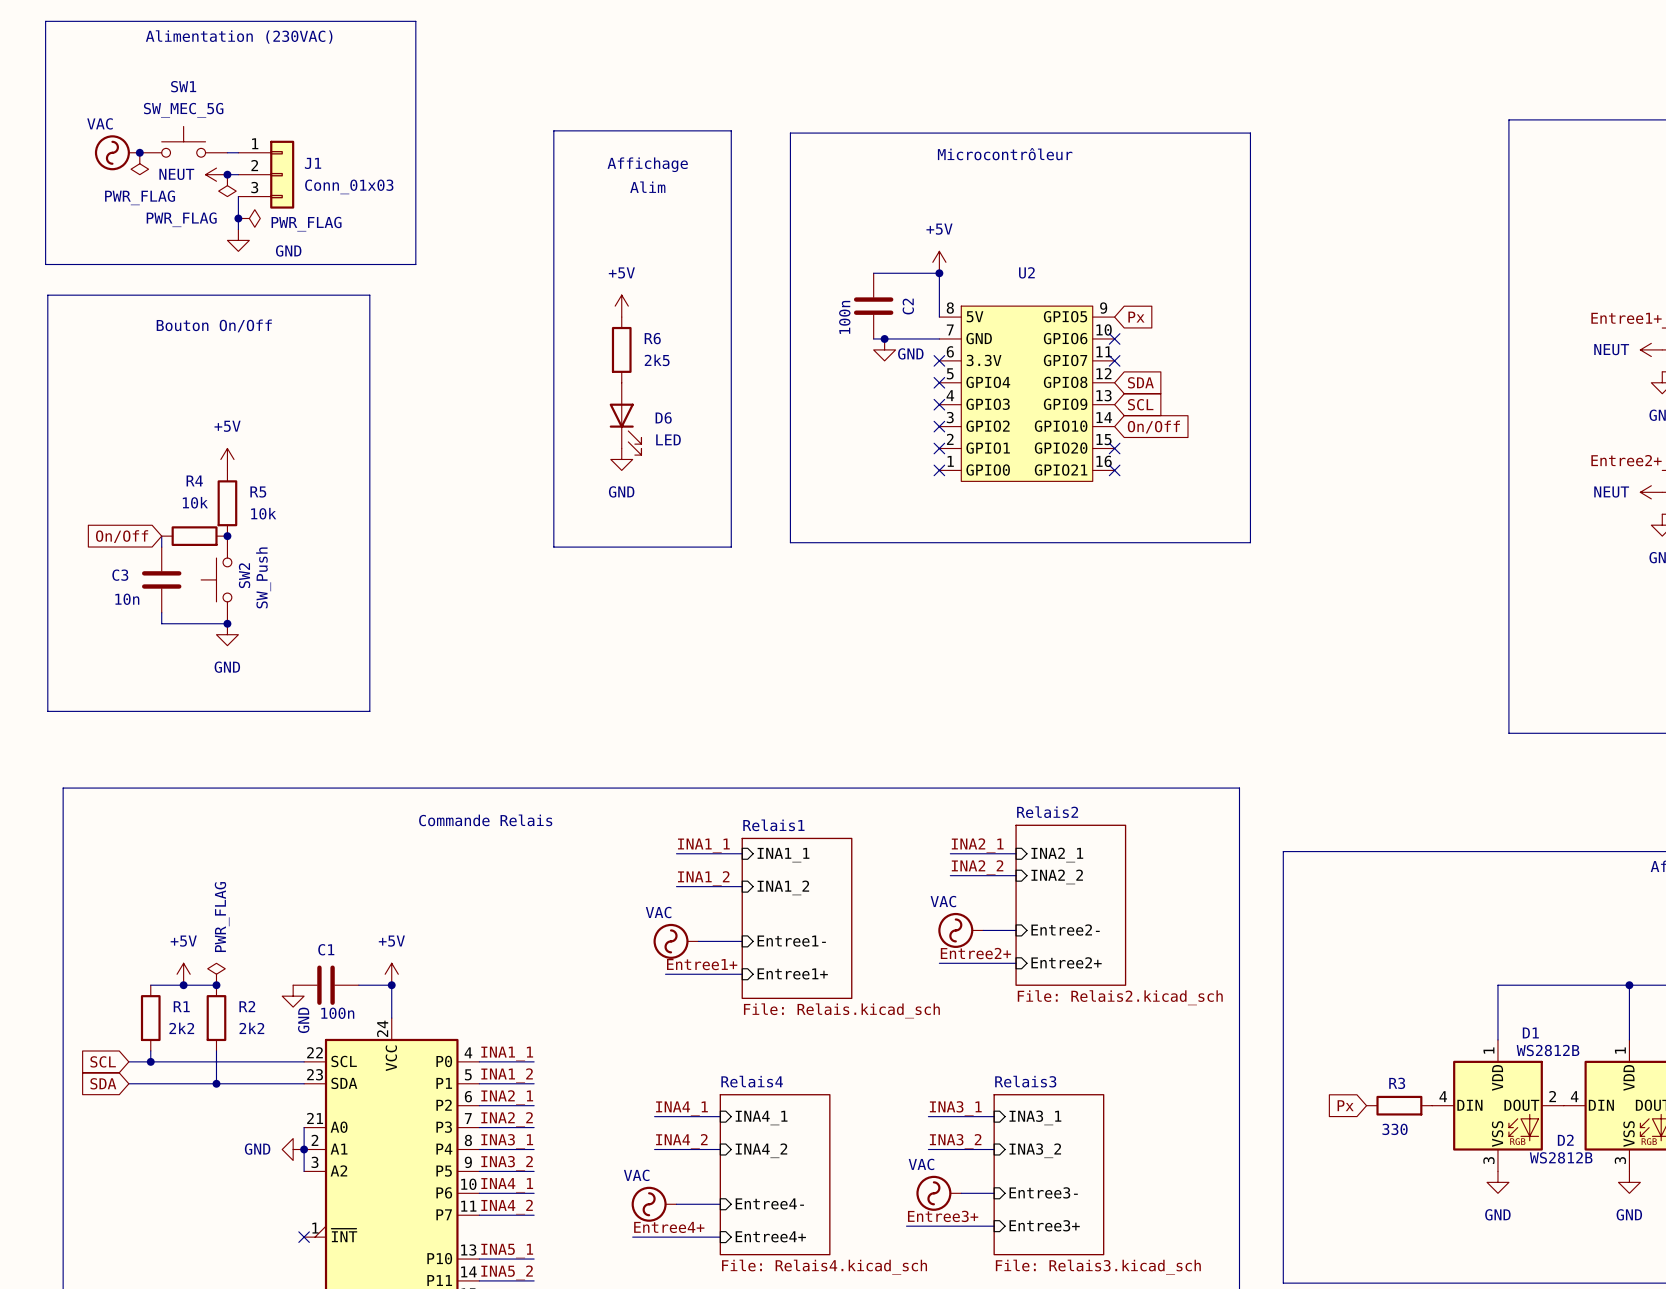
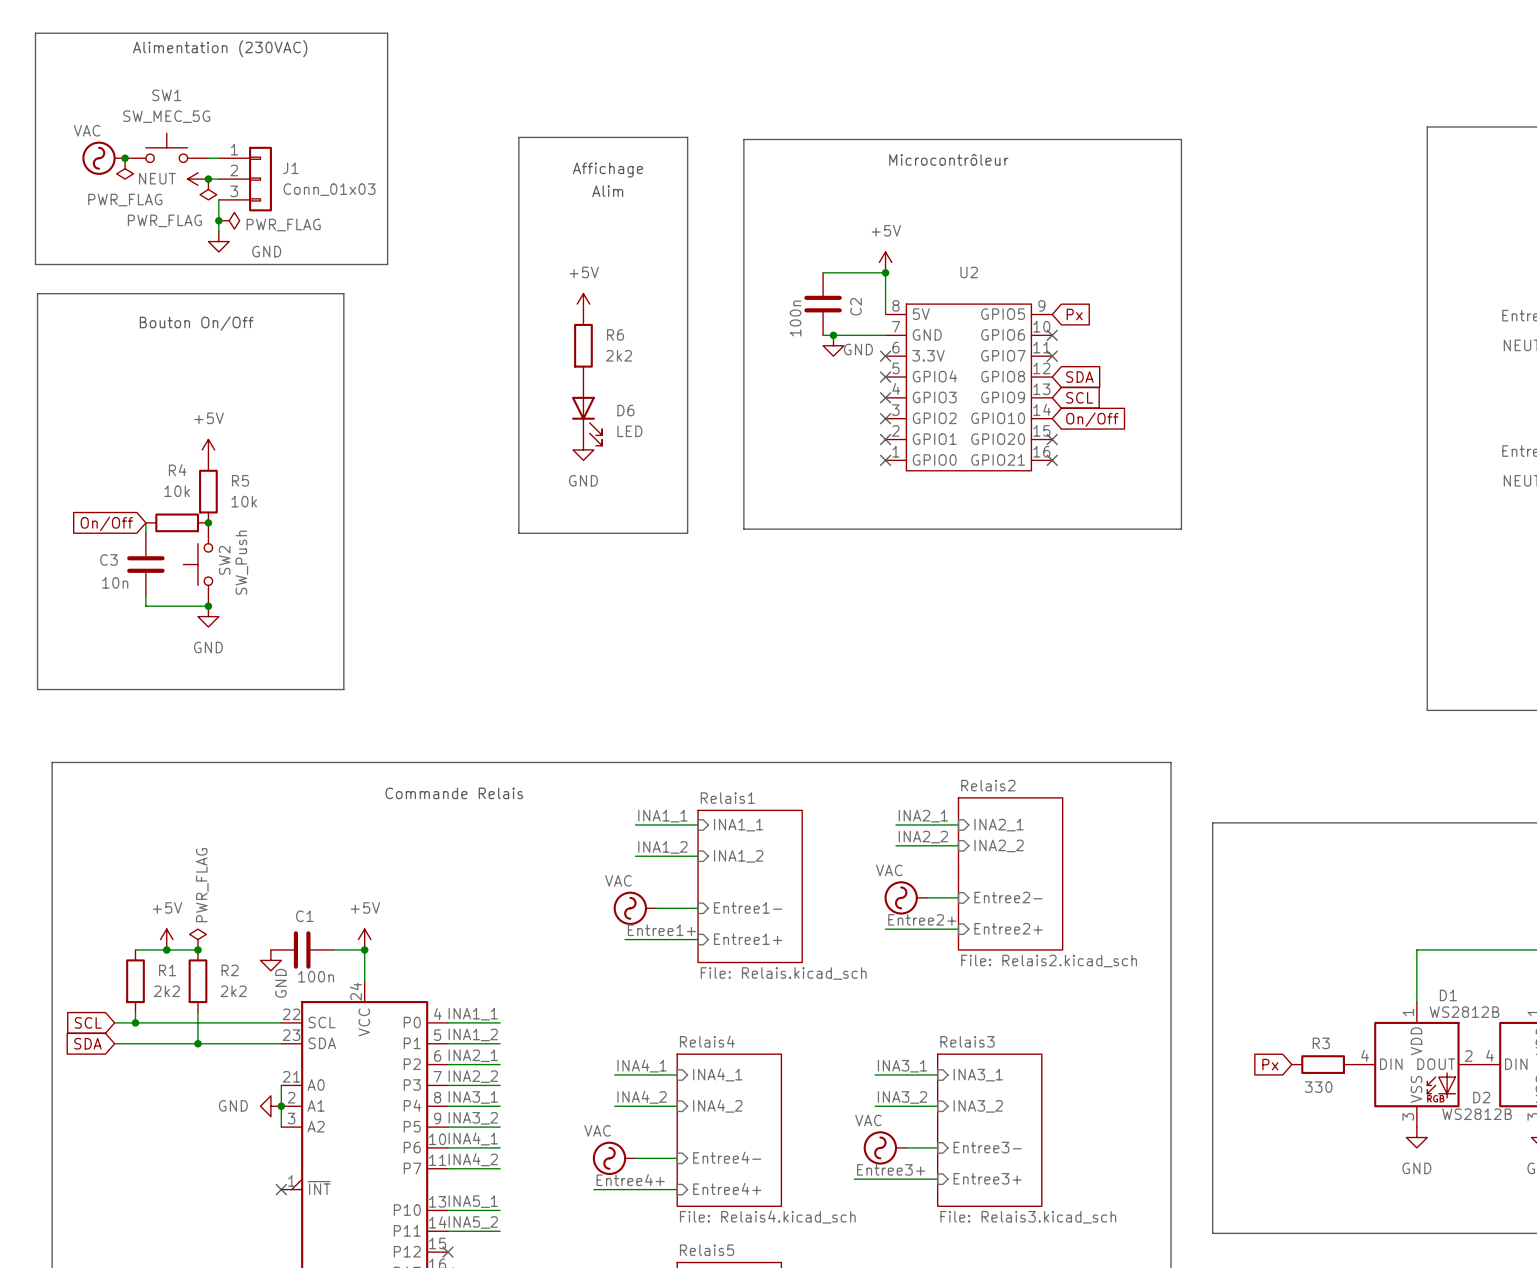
R6 value: 2k5 (657, 360) -> 2k2 (619, 355)

